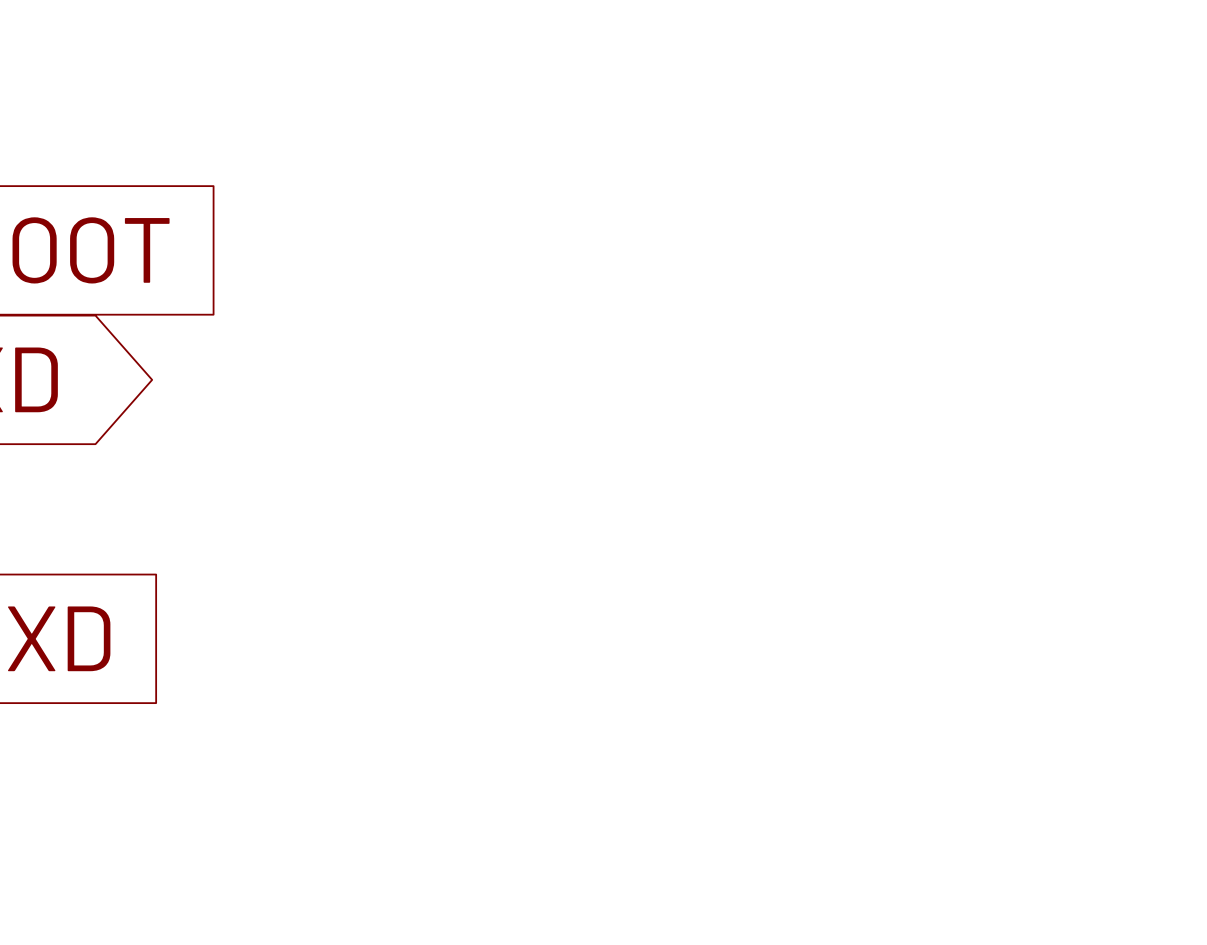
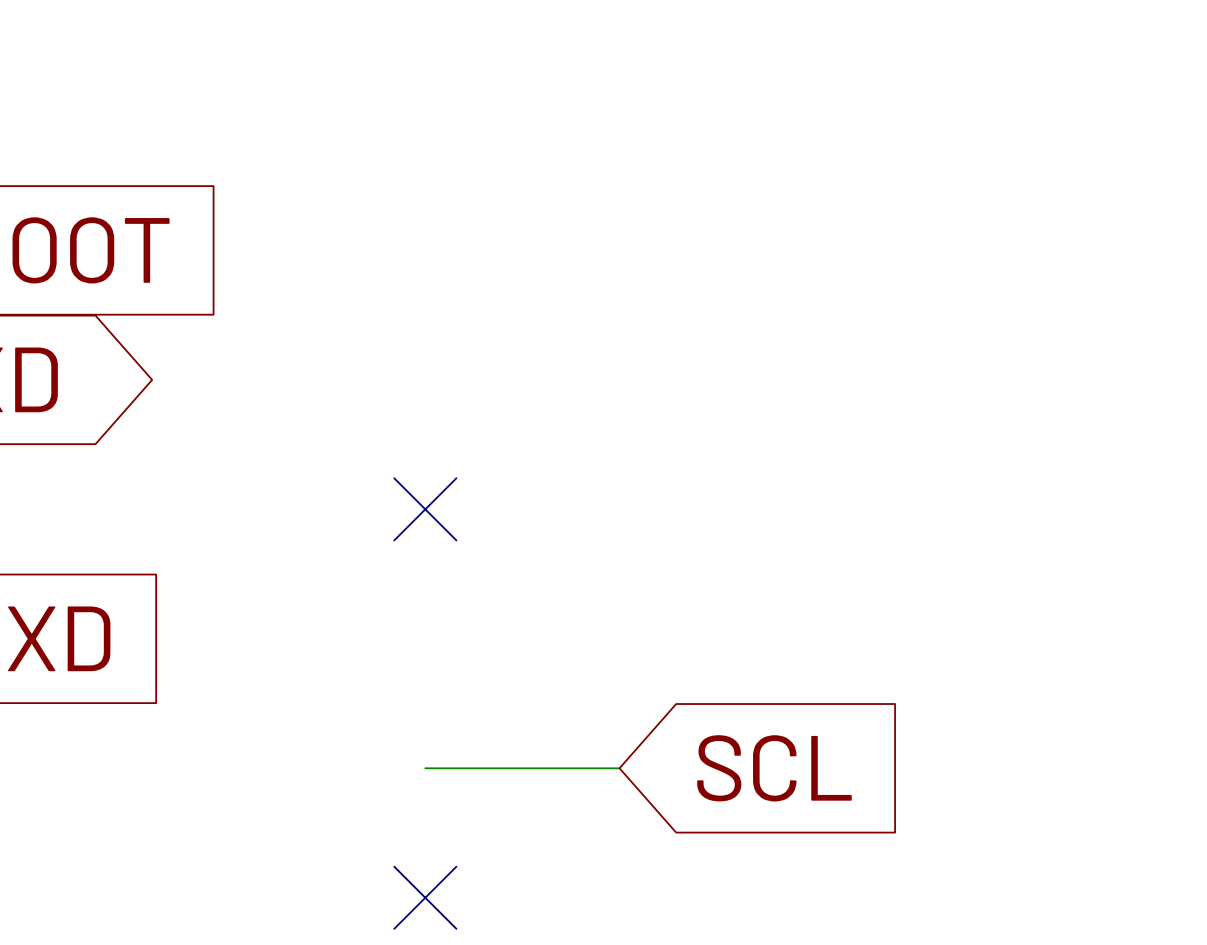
no-connect mark: none -> (425, 509)
wire: none -> (425, 768) (619, 768)
global label: none -> SCL (774, 768)
no-connect mark: none -> (425, 897)

